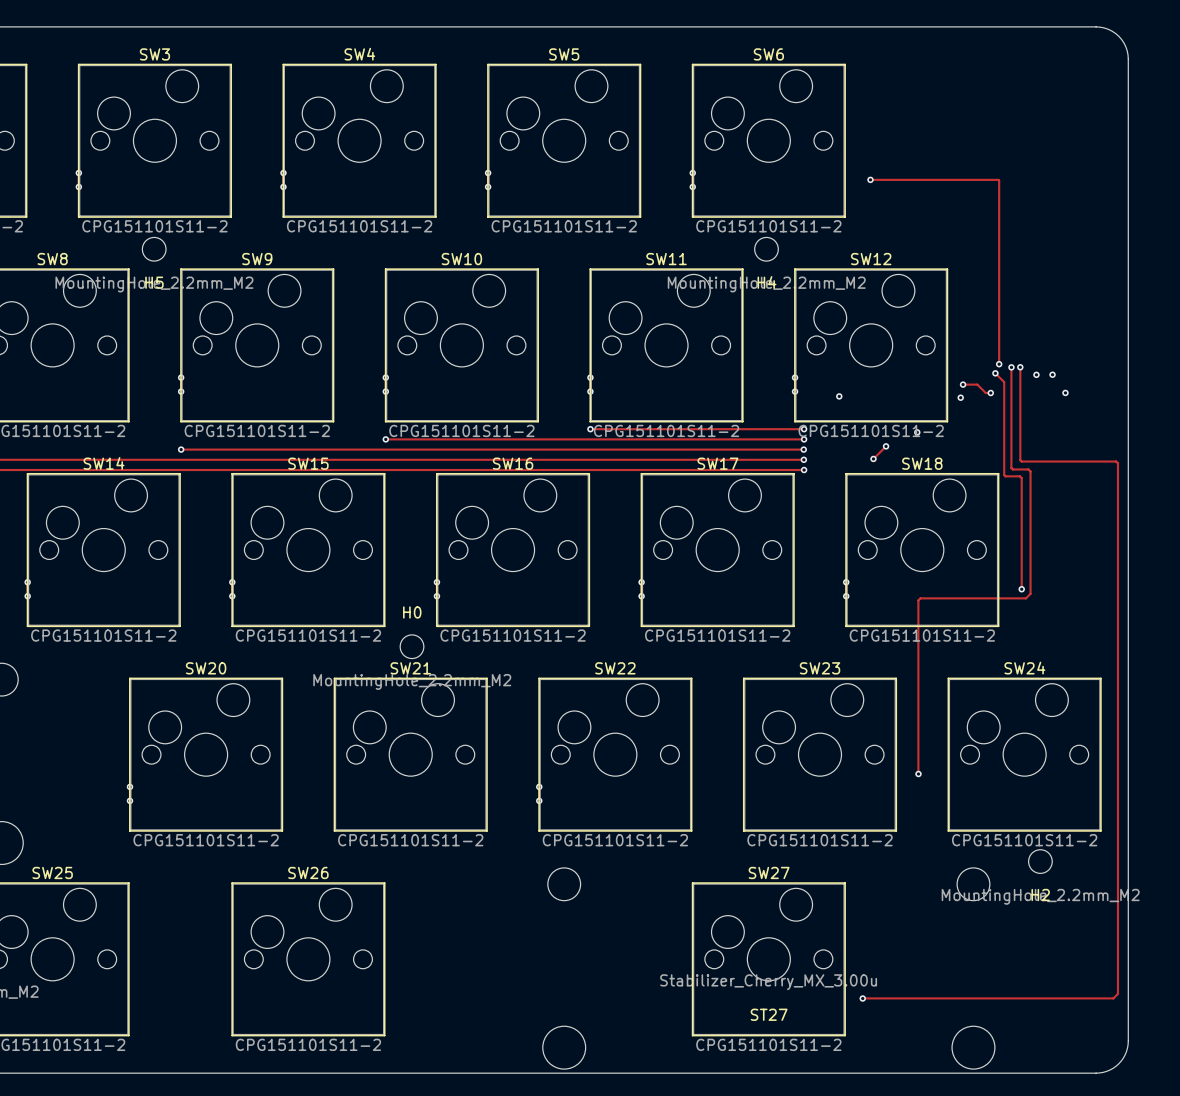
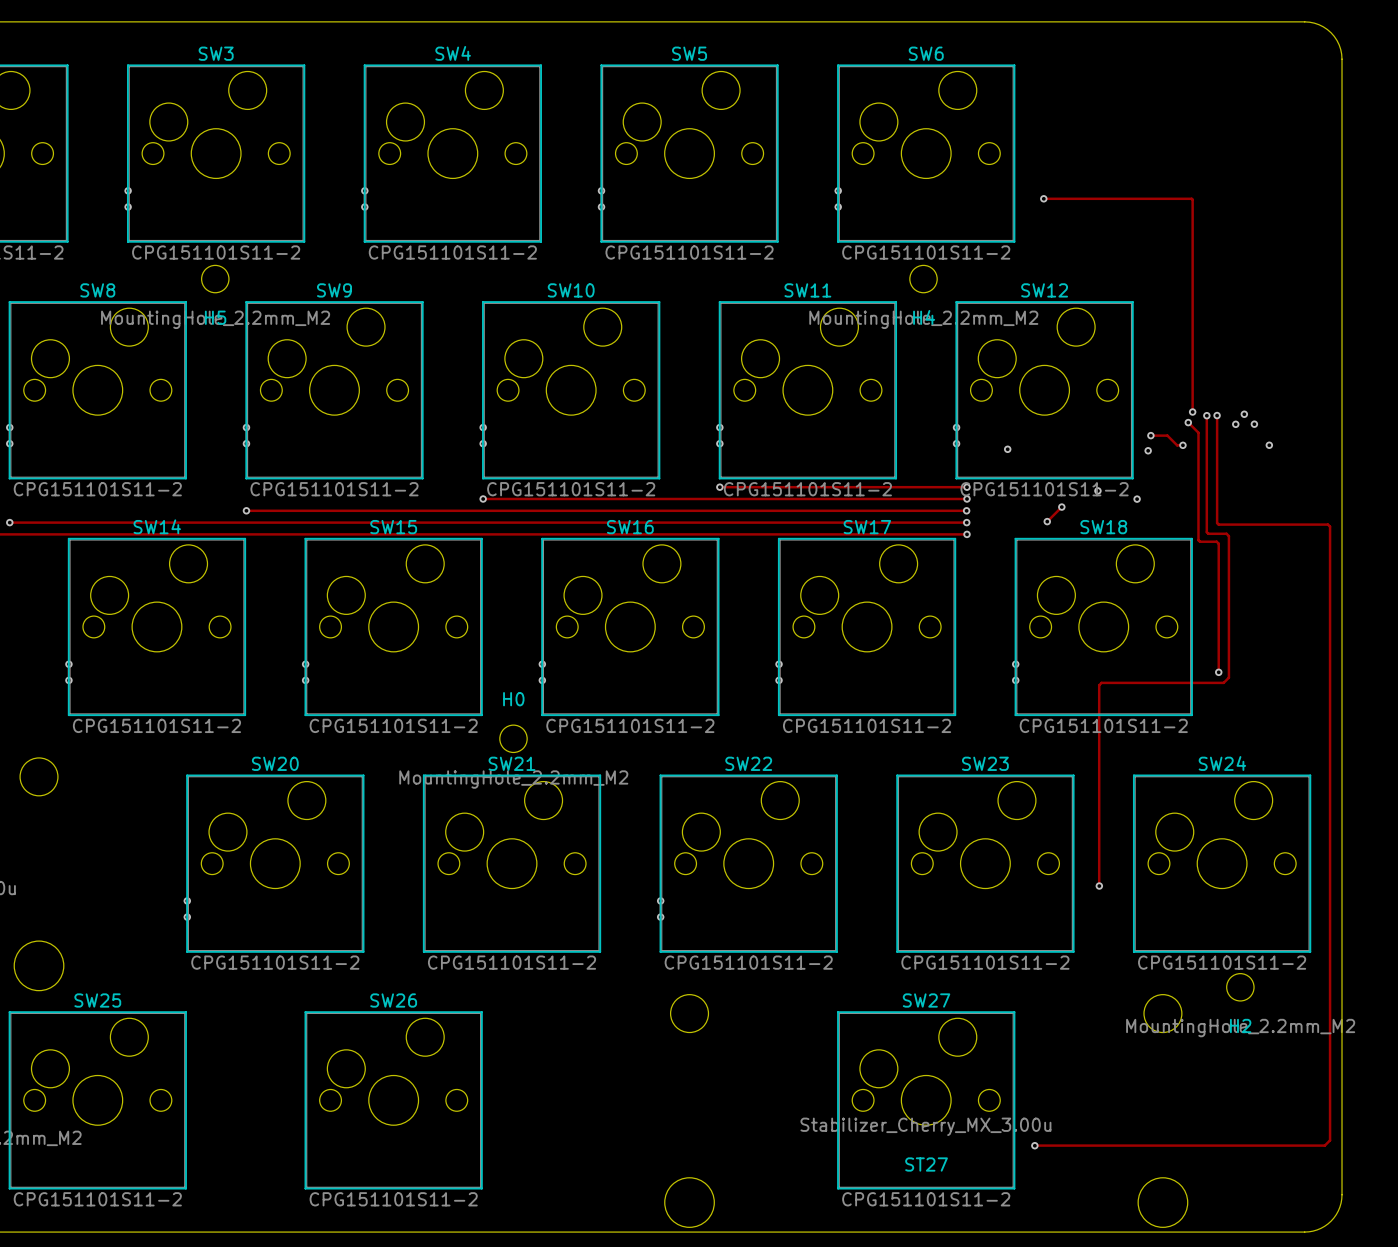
via: none -> (1244, 414)
via: none -> (1137, 499)

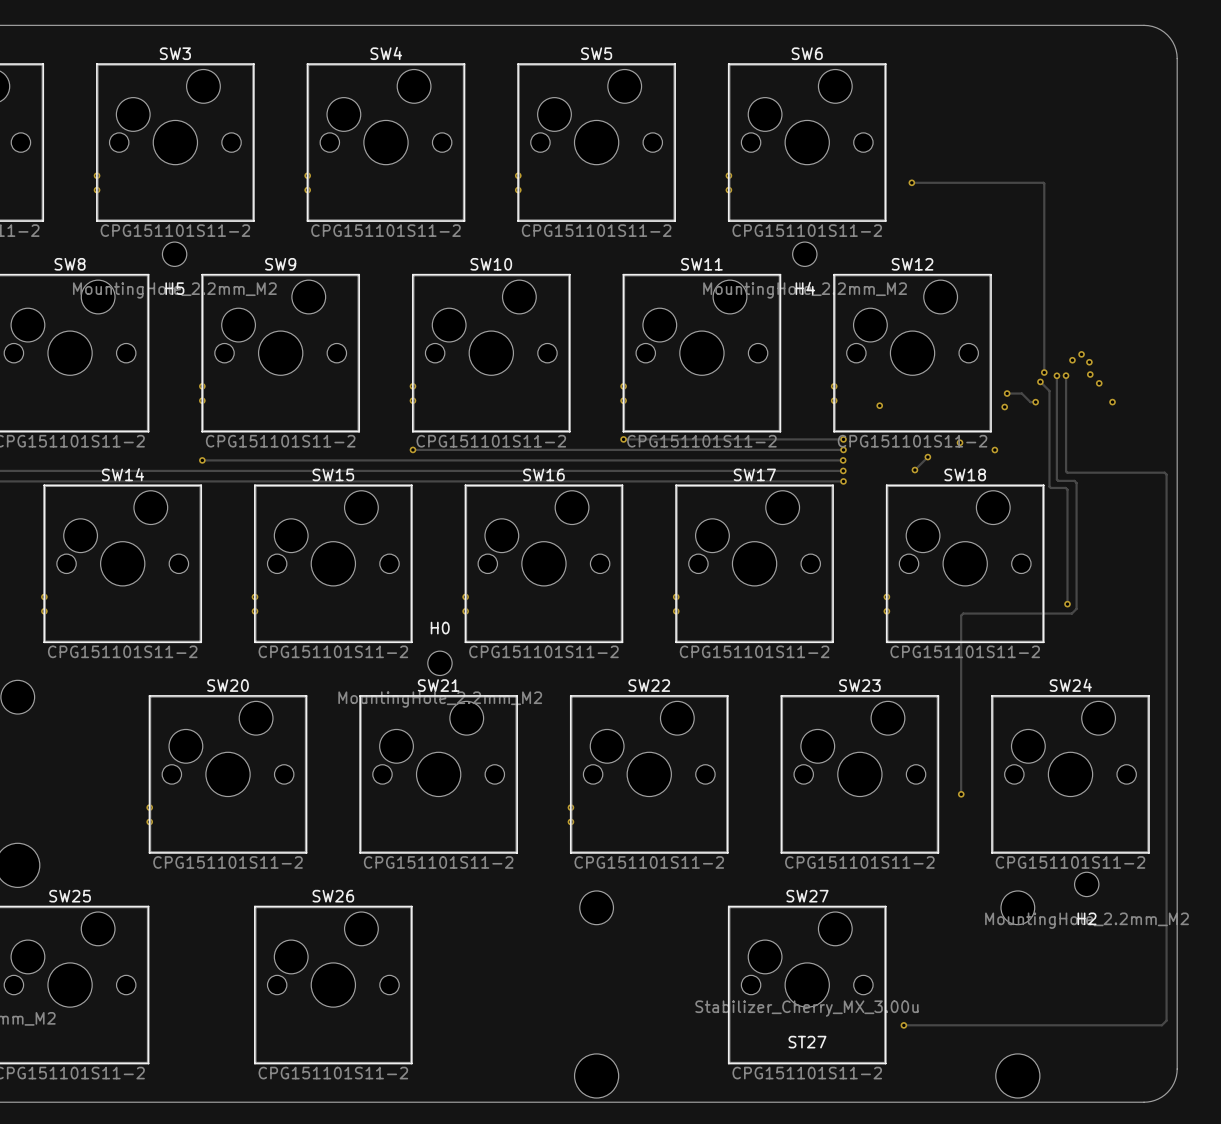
via: none -> (1081, 354)
via: none -> (1072, 360)
via: none -> (1089, 362)
via: (1235, 424) -> none

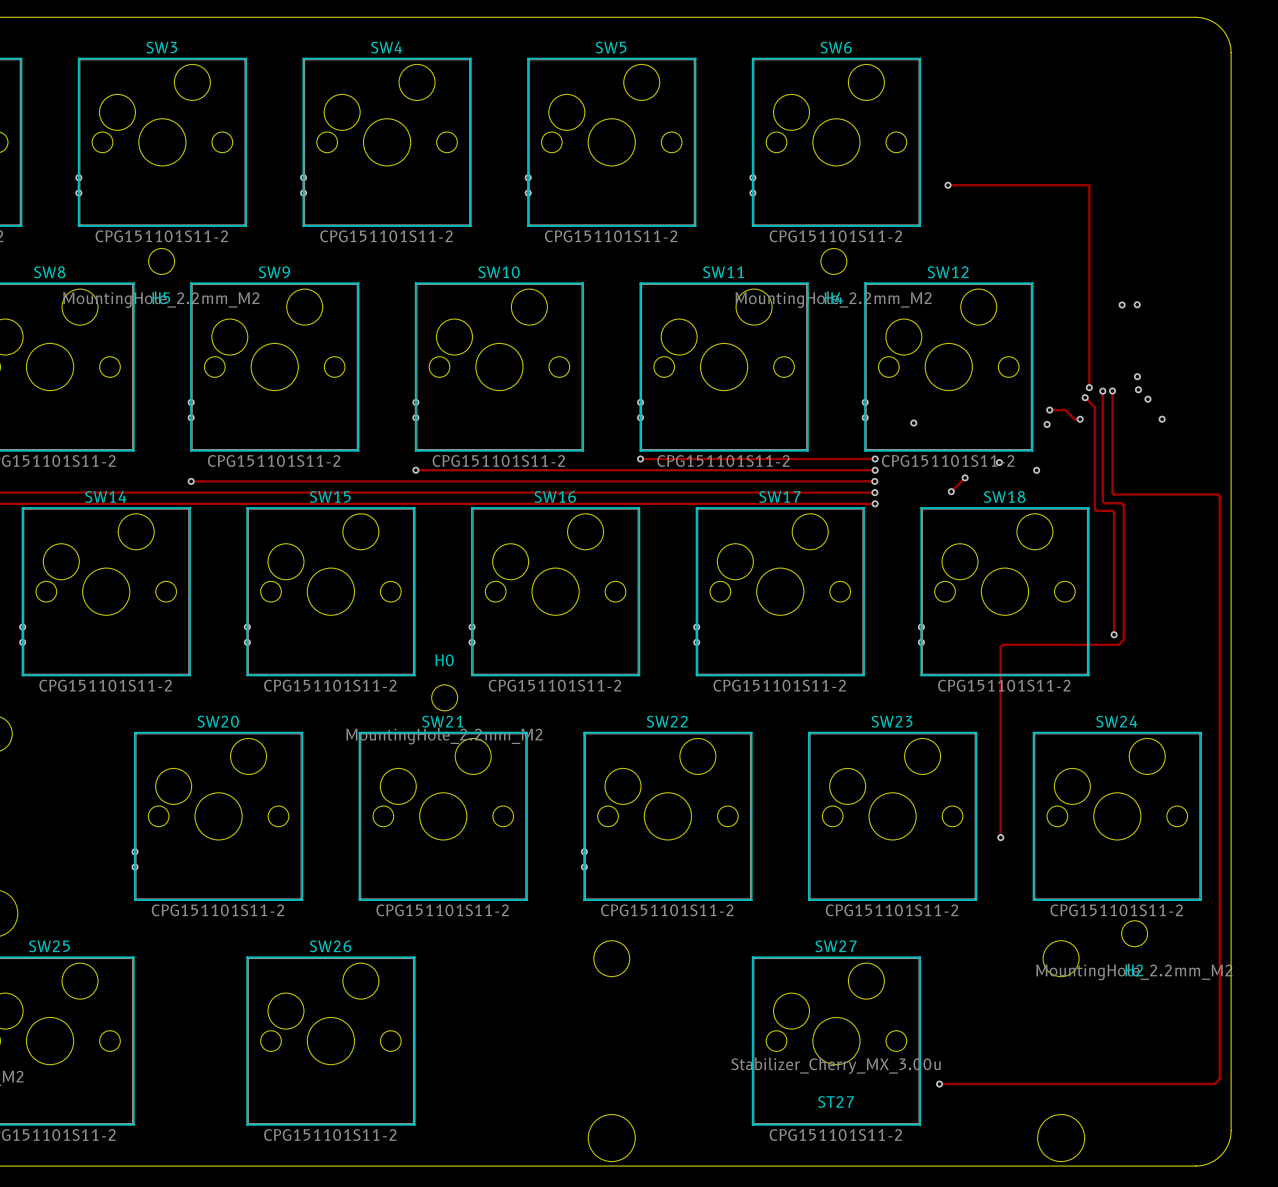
via: none -> (1137, 304)
via: none -> (1122, 304)
via: (1081, 354) -> none
via: (1072, 360) -> none

